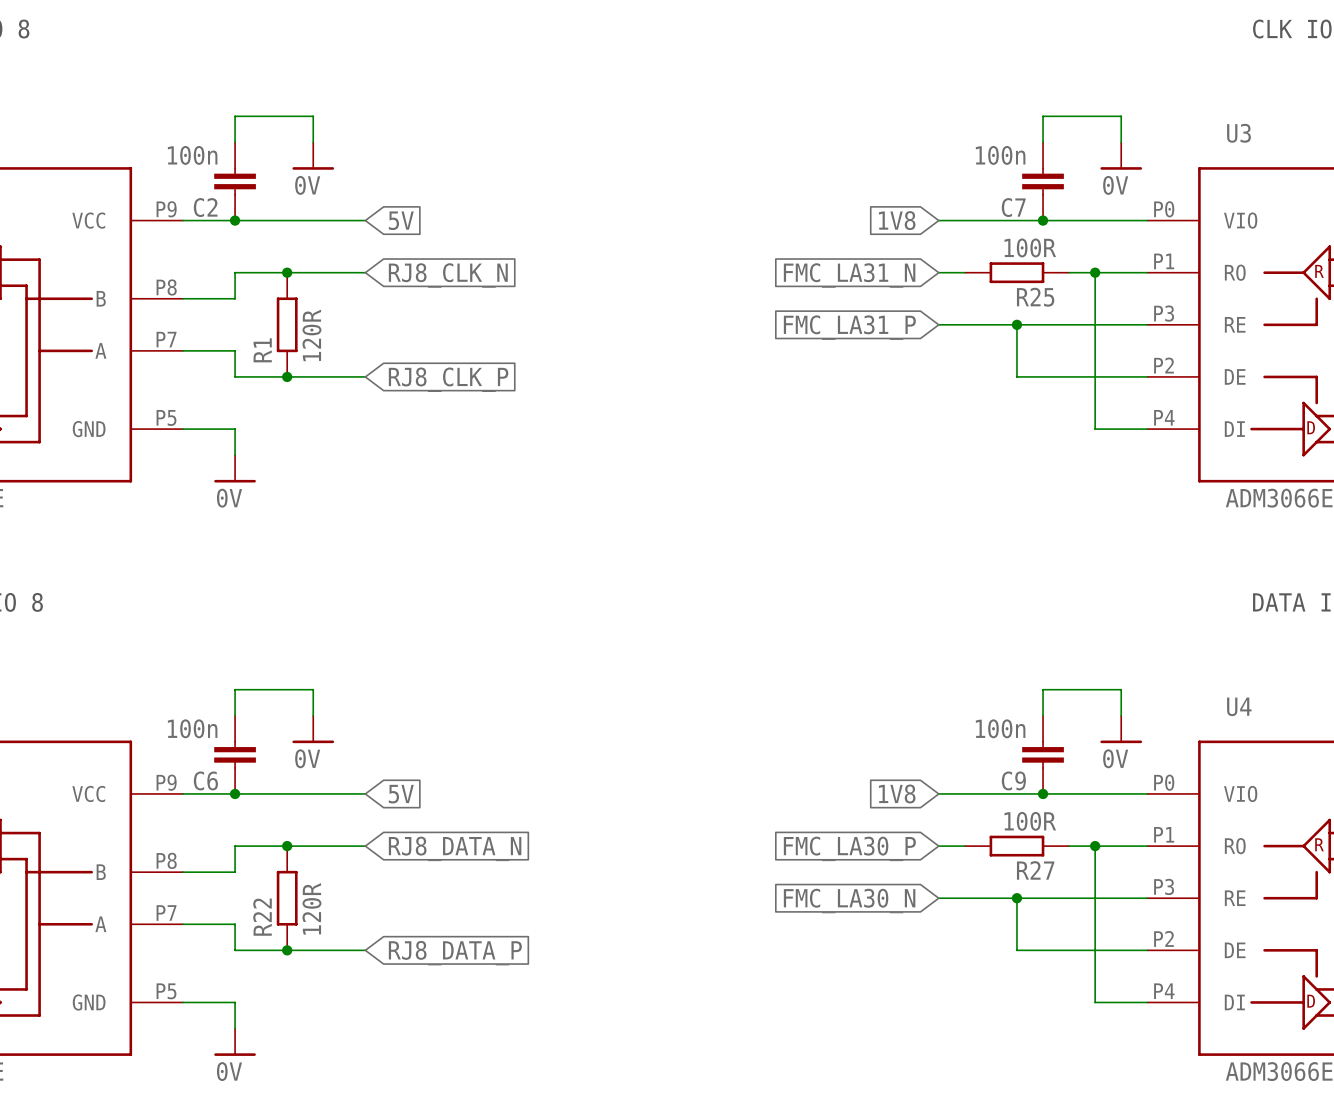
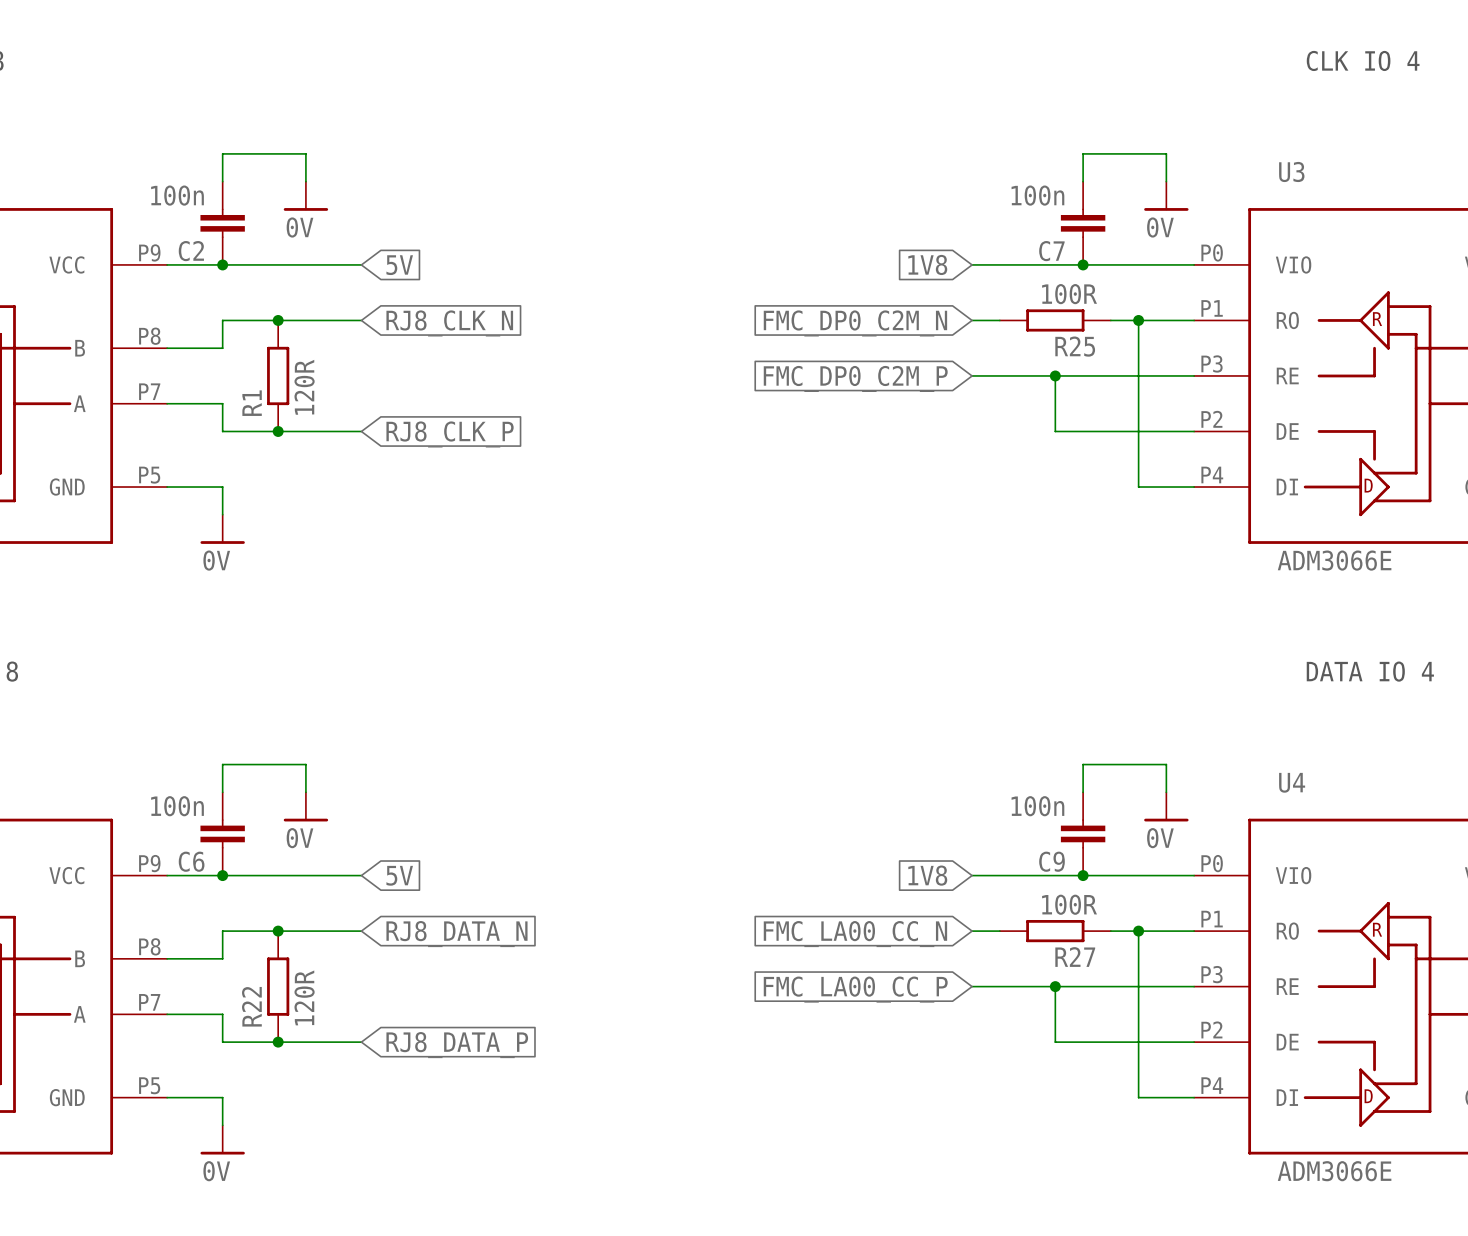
global label: FMC_LA31_N (849, 275) -> FMC_DP0_C2M_N (855, 323)
global label: FMC_LA31_P (849, 327) -> FMC_DP0_C2M_P (855, 378)
global label: FMC_LA30_P (849, 848) -> FMC_LA00_CC_N (855, 934)
global label: FMC_LA30_N (849, 901) -> FMC_LA00_CC_P (855, 989)

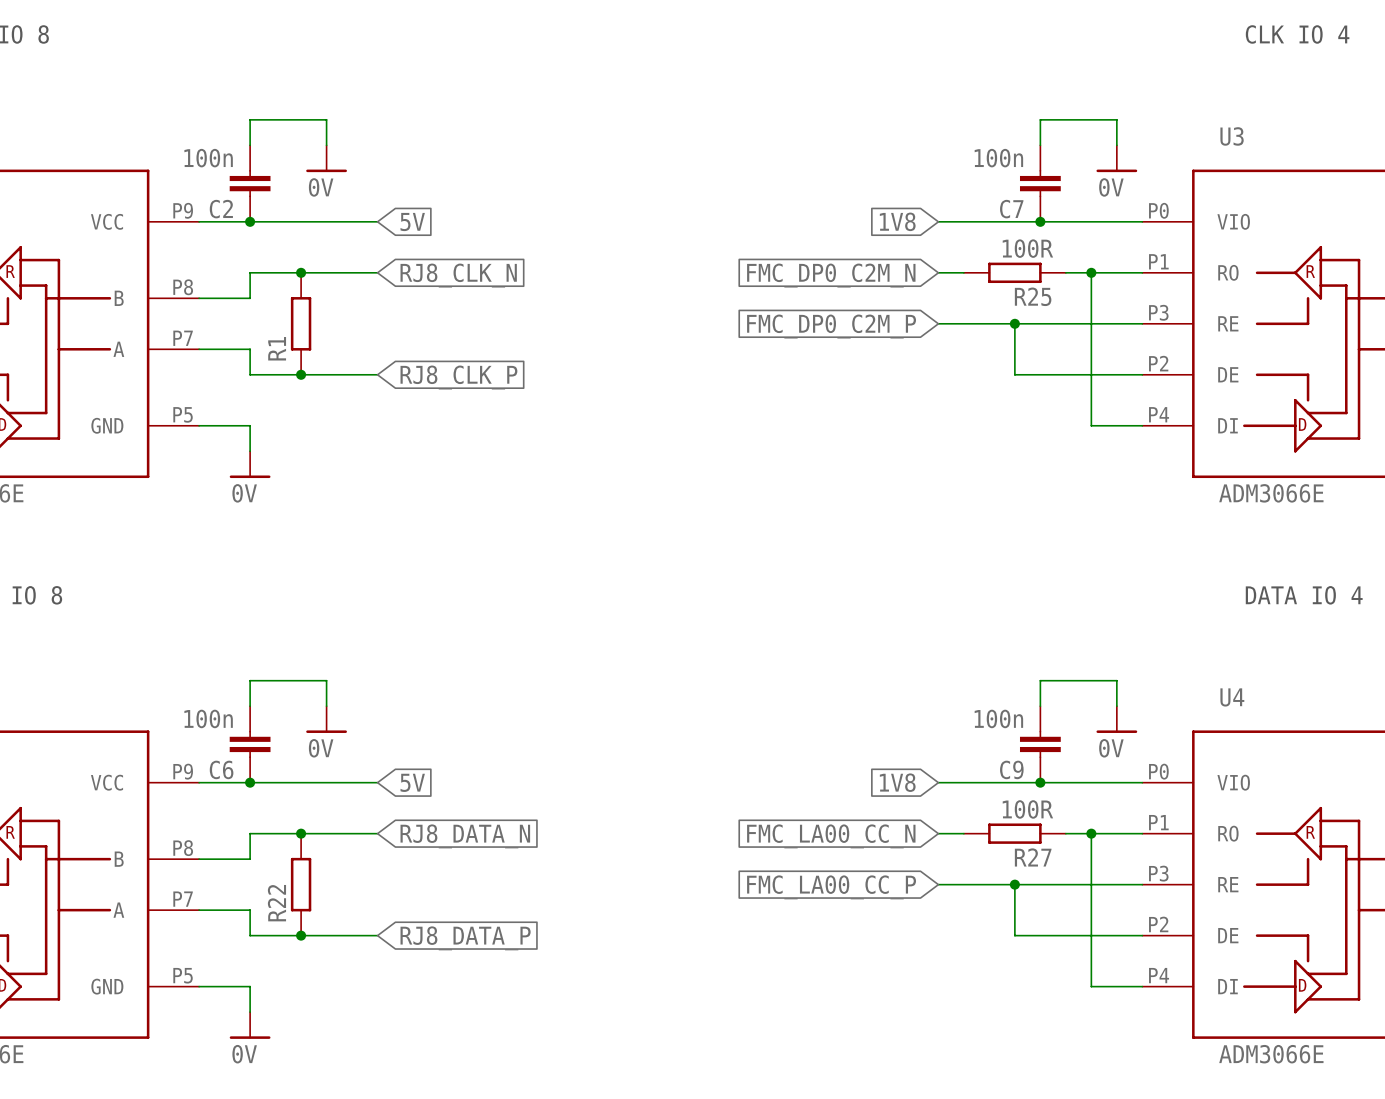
R1 value: 120R (304, 387) -> none
R22 value: 120R (304, 997) -> none

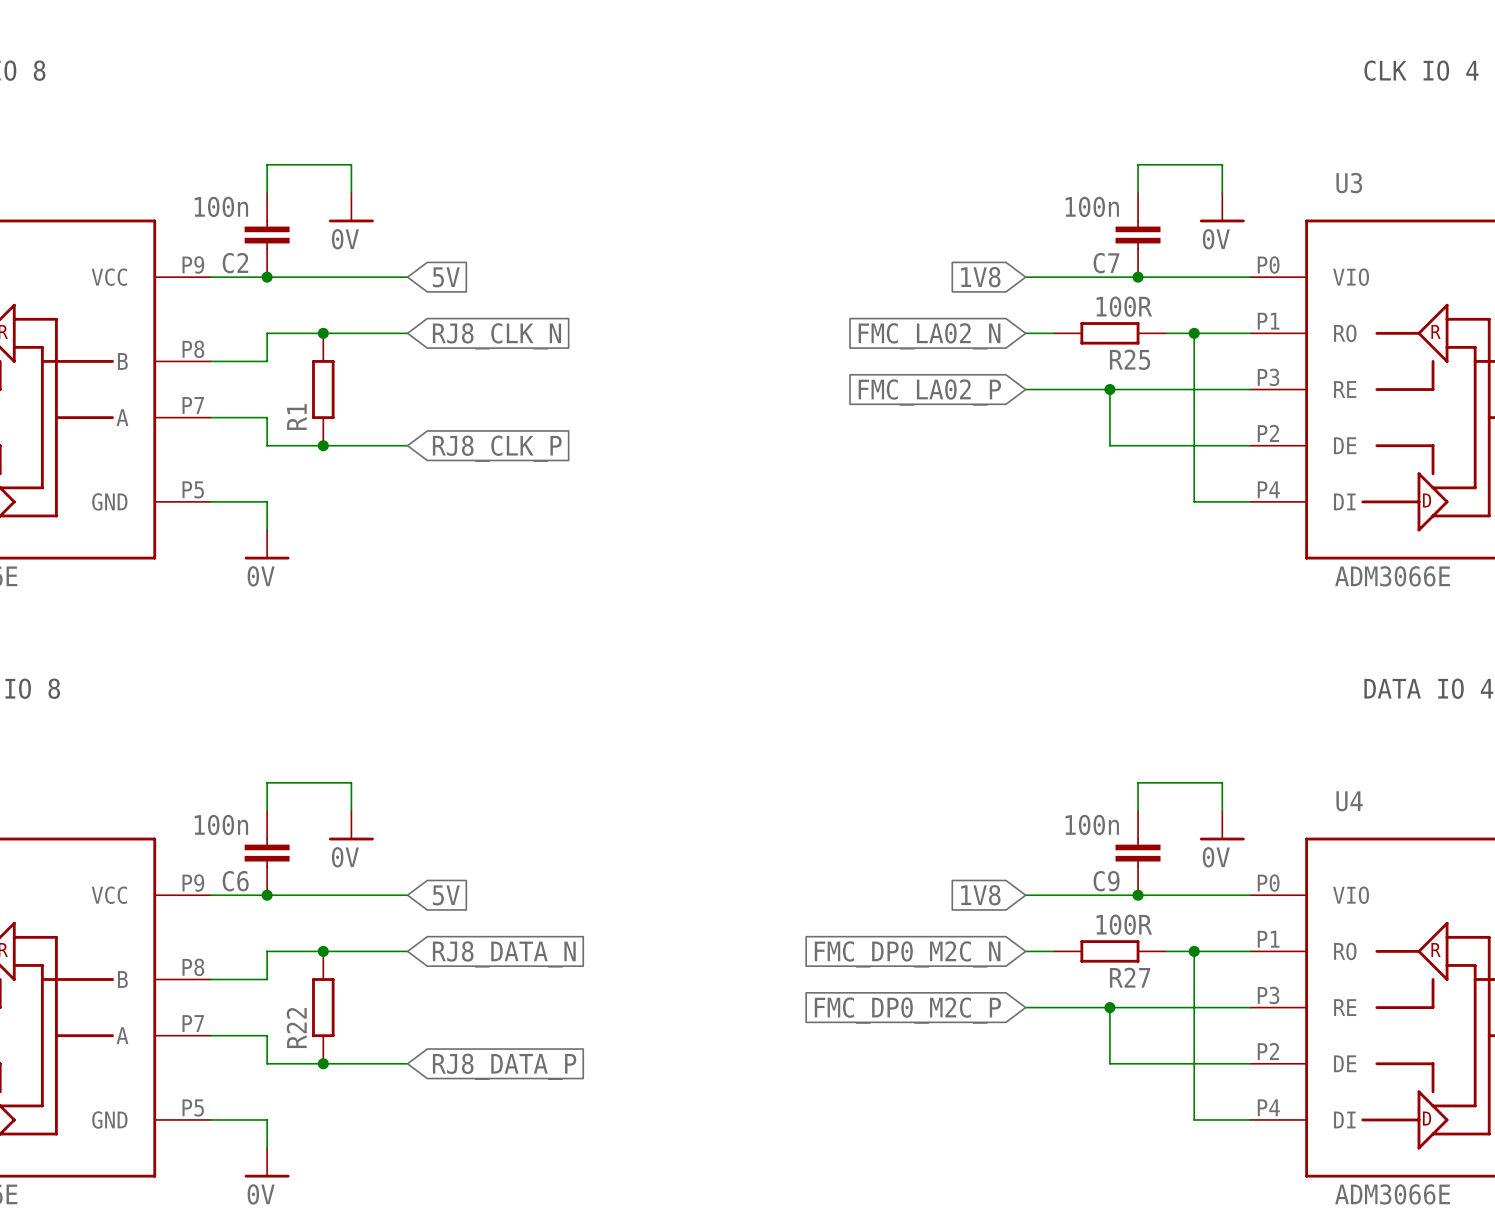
global label: FMC_DP0_C2M_N (831, 275) -> FMC_LA02_N (929, 336)
global label: FMC_DP0_C2M_P (831, 326) -> FMC_LA02_P (929, 392)
global label: FMC_LA00_CC_N (831, 836) -> FMC_DP0_M2C_N (907, 954)
global label: FMC_LA00_CC_P (831, 887) -> FMC_DP0_M2C_P (907, 1010)

